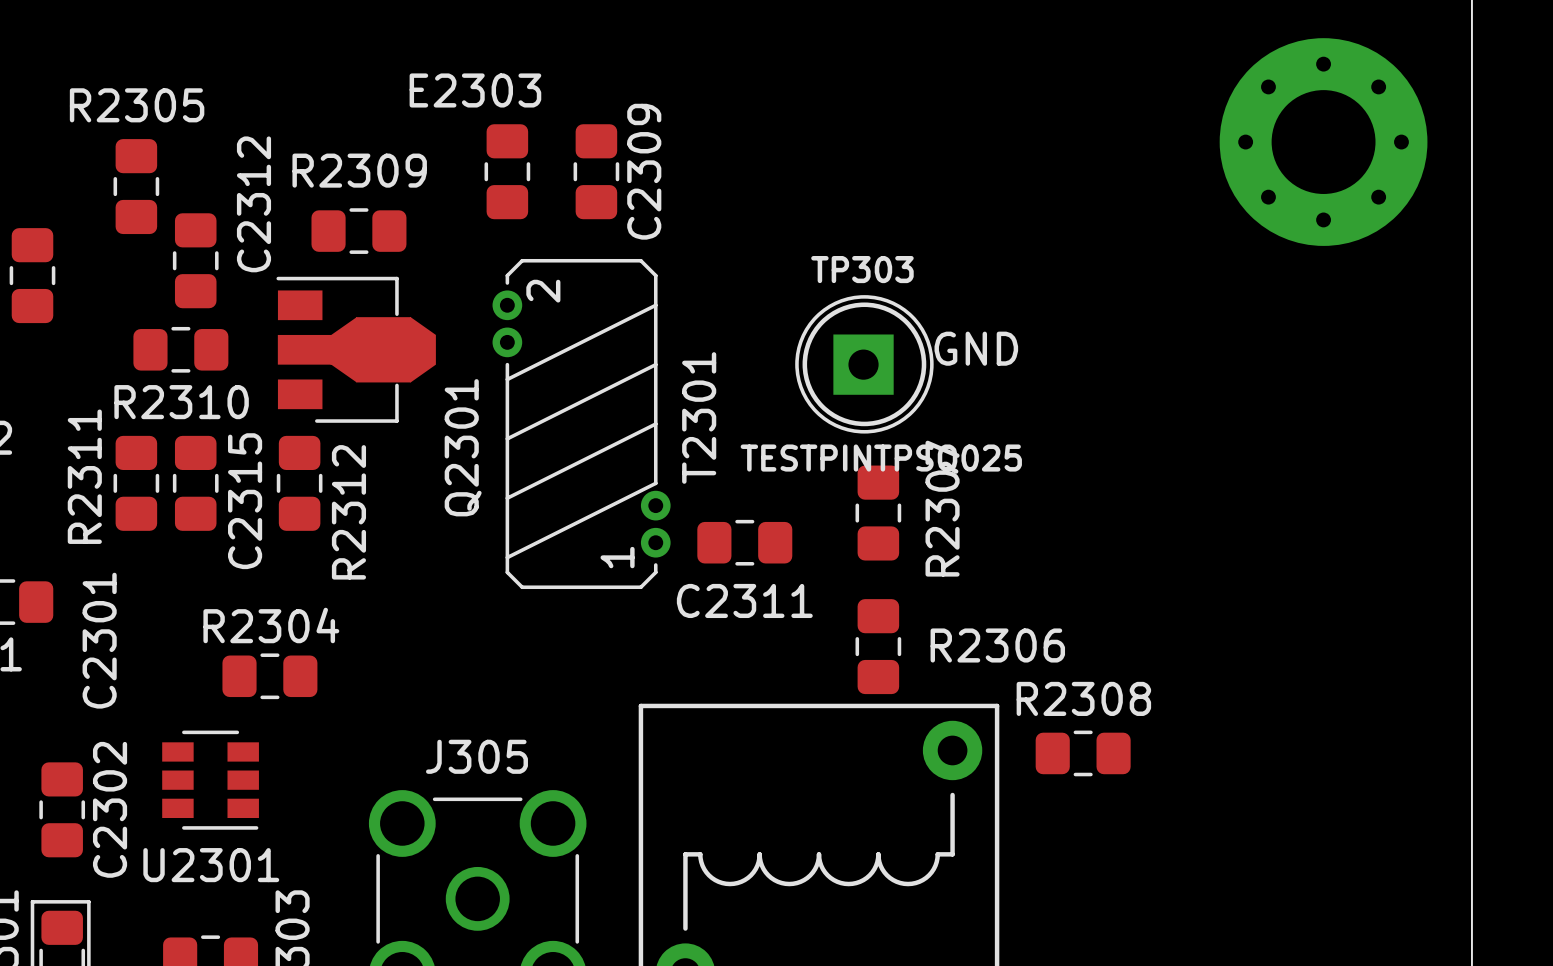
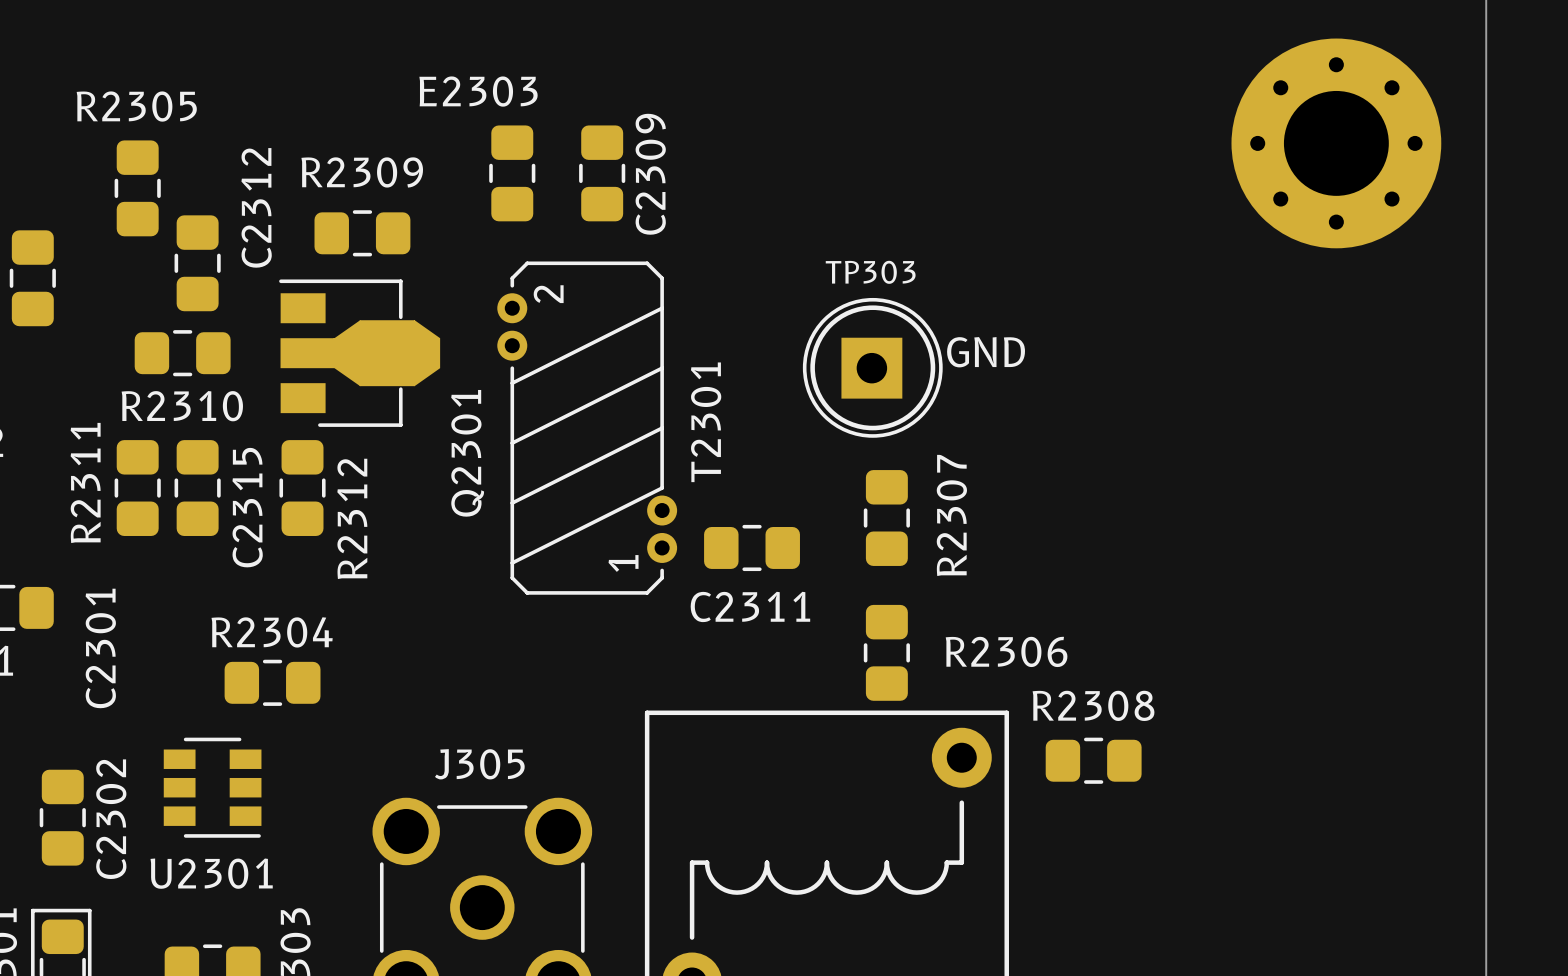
TP303 value: TESTPINTPSQ025 (881, 459) -> none

